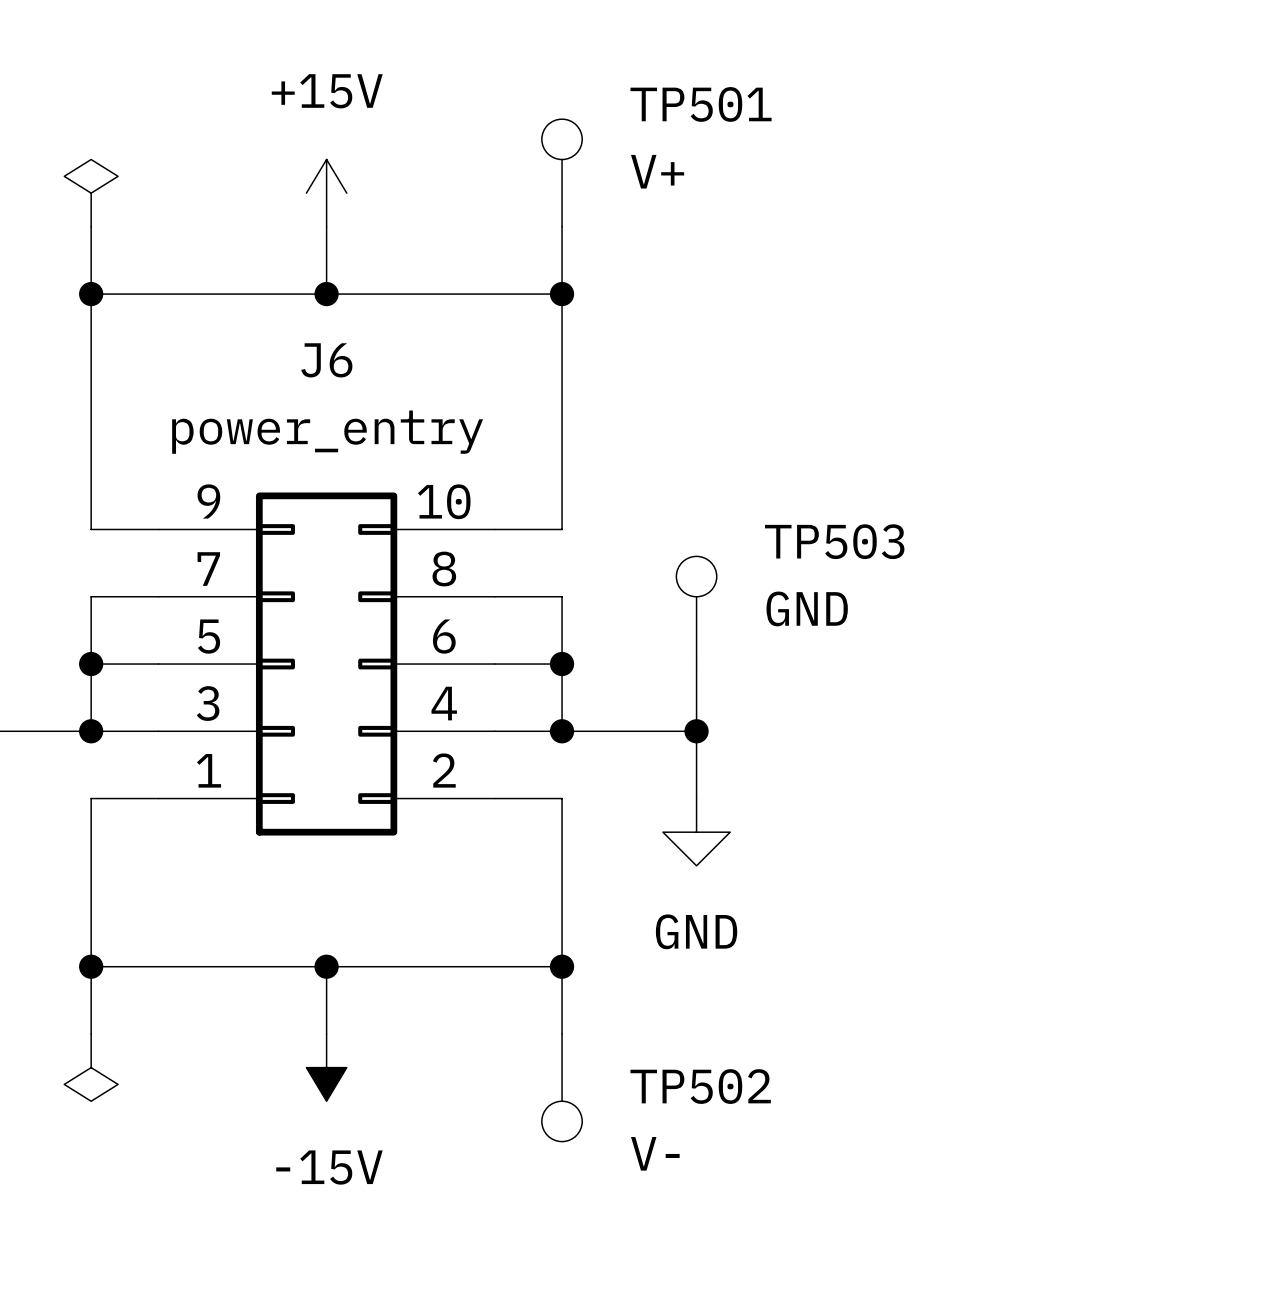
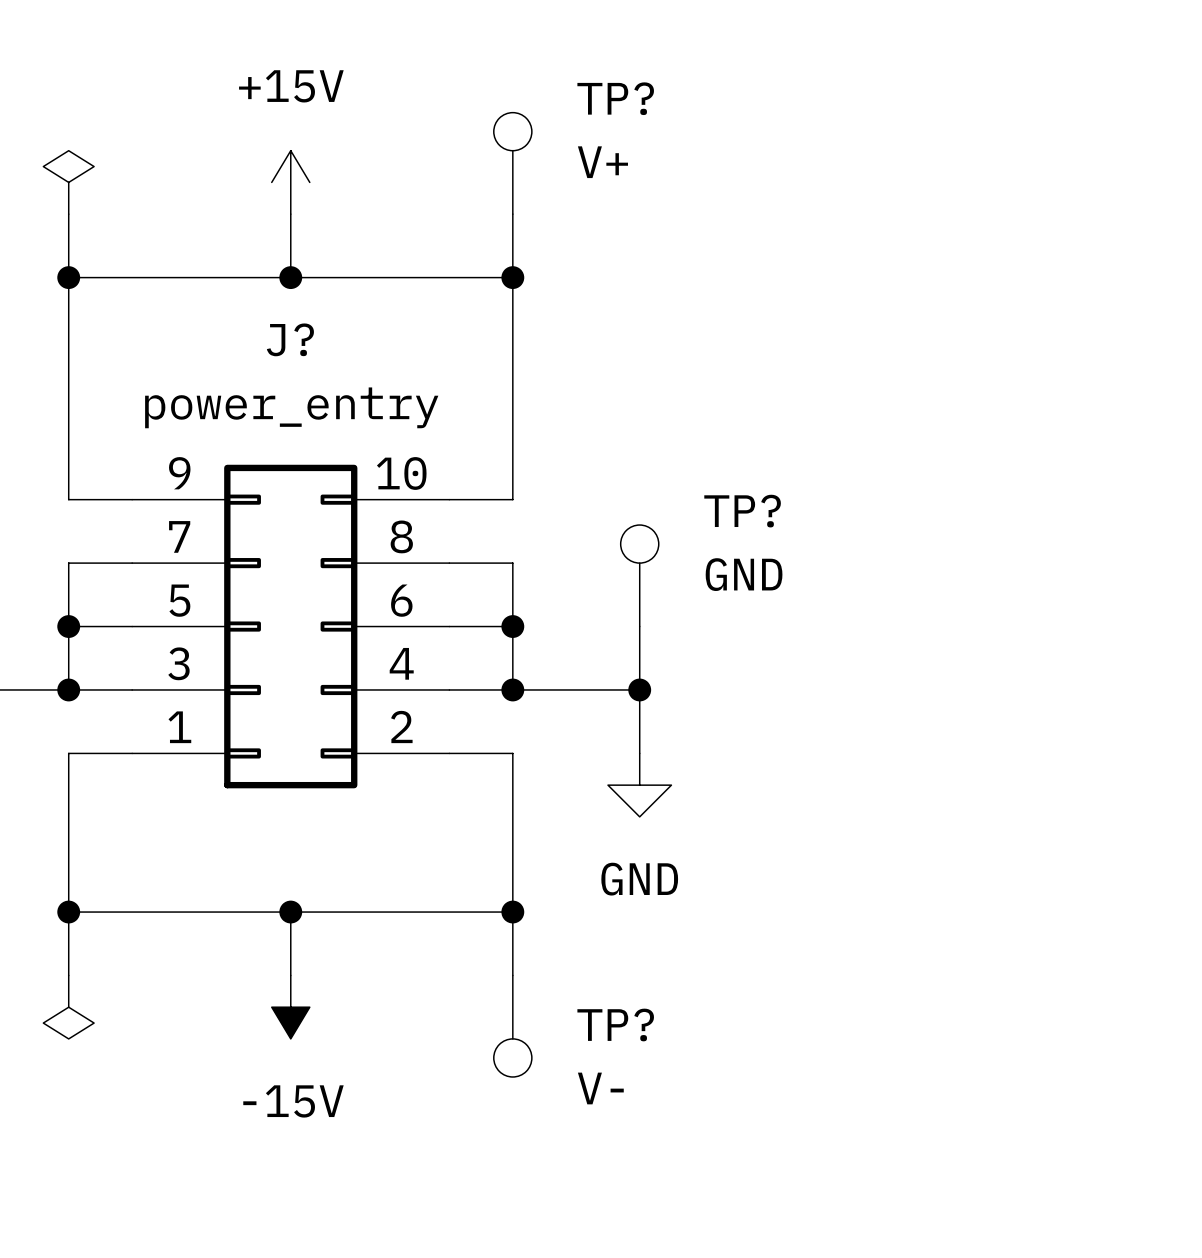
TP501 name: TP501 (701, 104) -> TP? (615, 98)
J6 name: J6 (326, 360) -> J? (290, 339)
TP503 name: TP503 (834, 541) -> TP? (742, 511)
TP502 name: TP502 (700, 1086) -> TP? (615, 1024)

